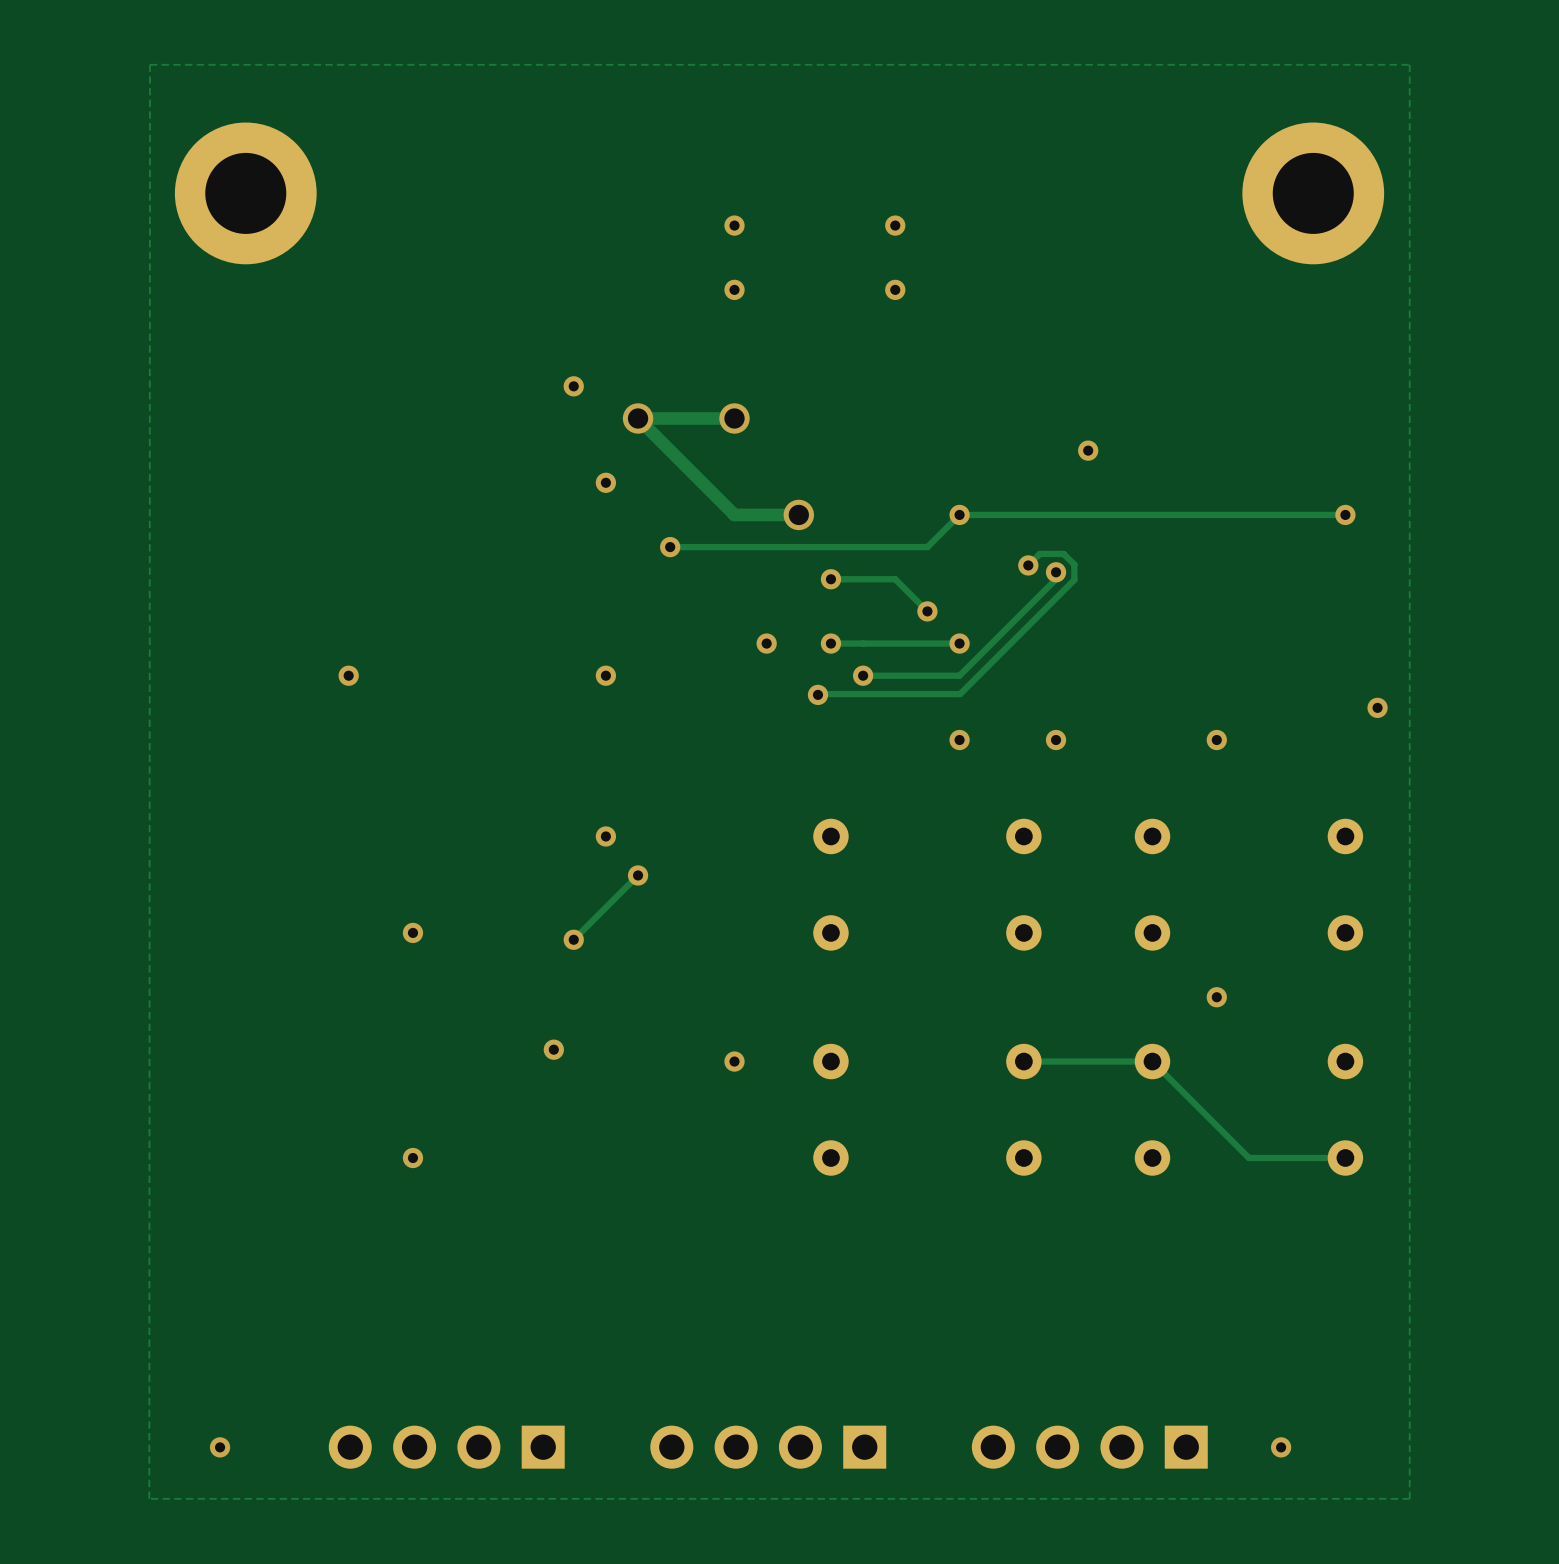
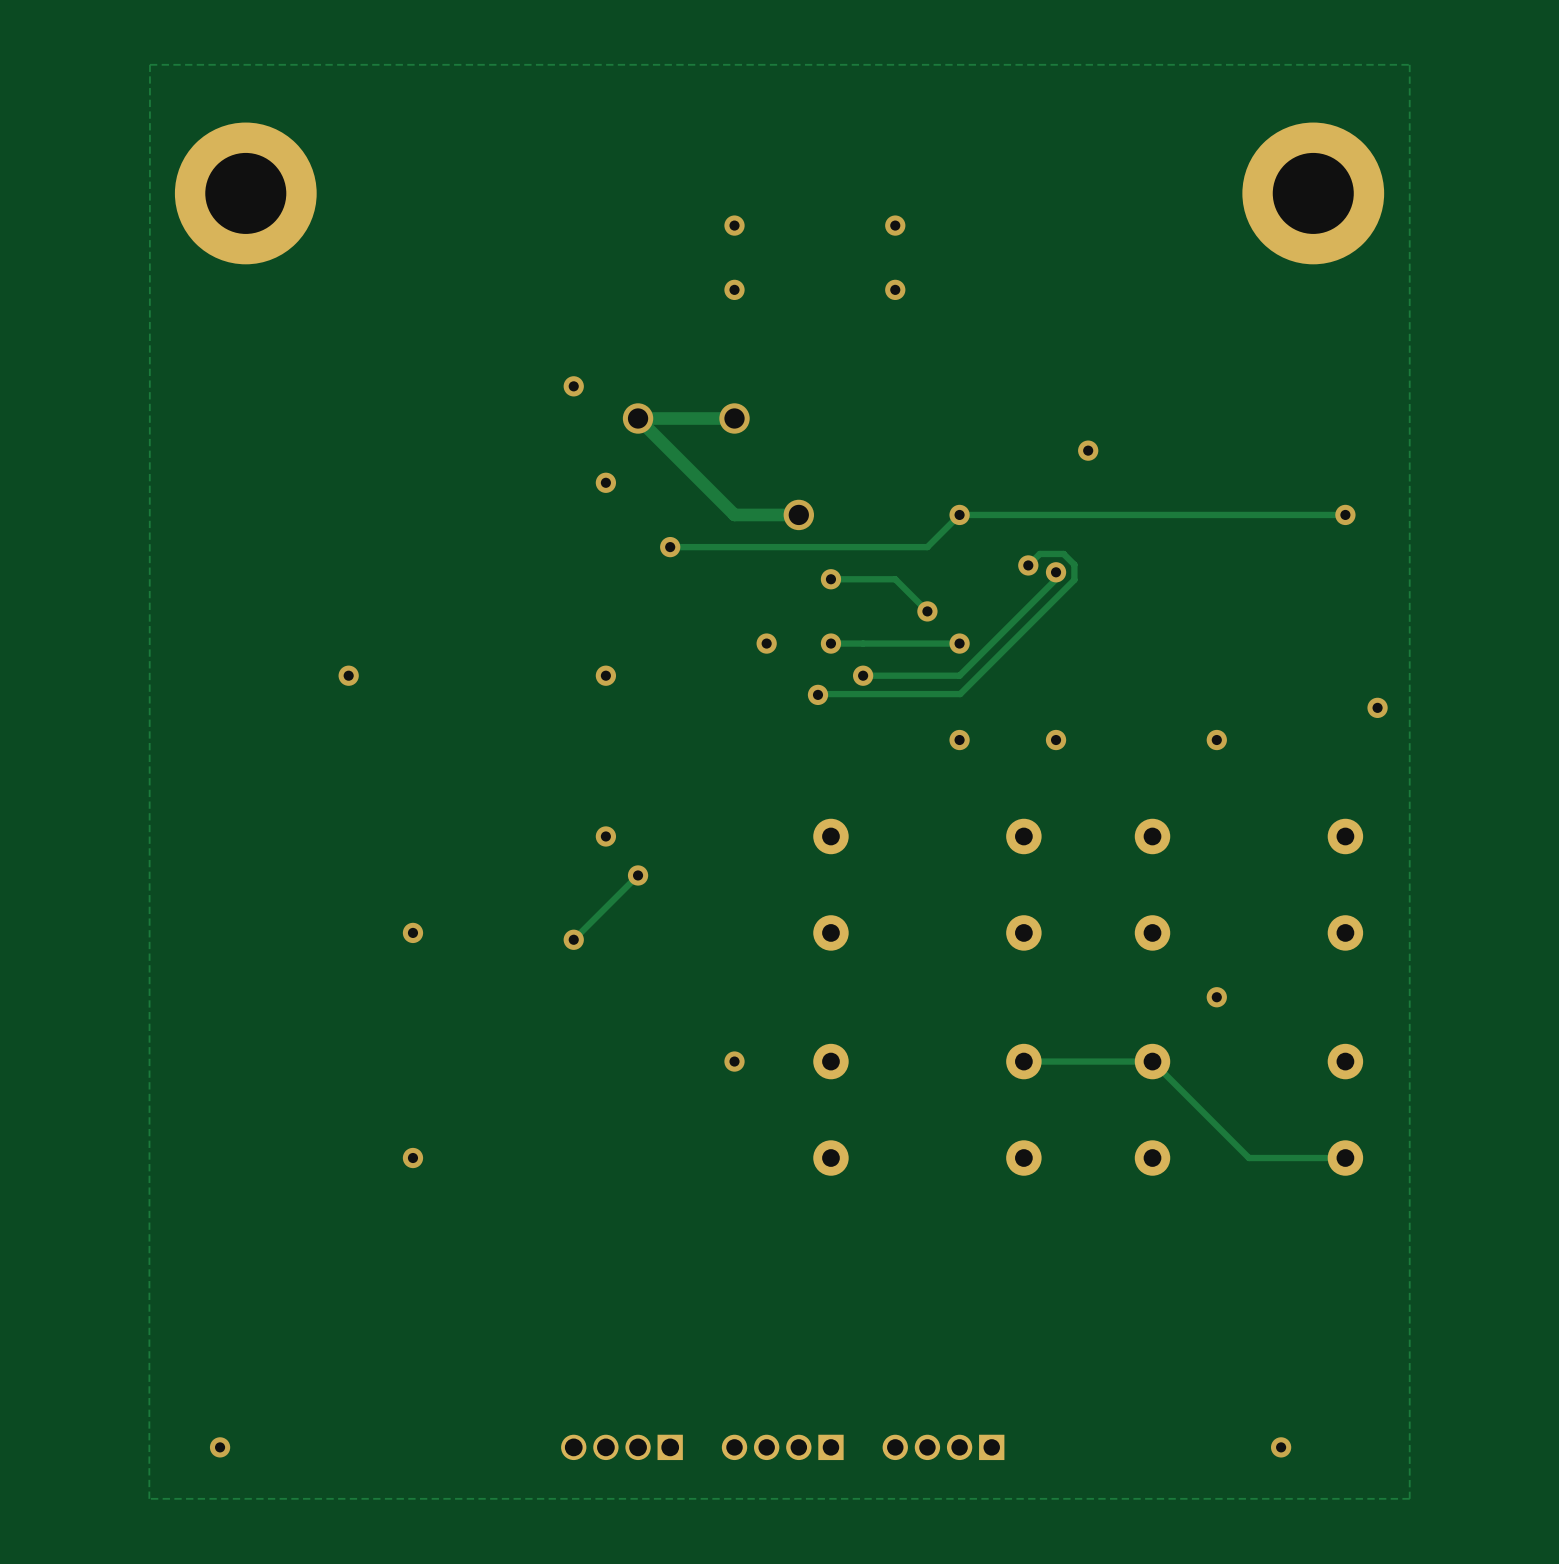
via: (553, 1049) -> none
part footprint: [650, 1425, 887, 1469] -> [721, 1434, 844, 1461]
part: (446, 1447) -> none
part: none -> (621, 1447)
part: none -> (943, 1447)
part: (1089, 1447) -> none

